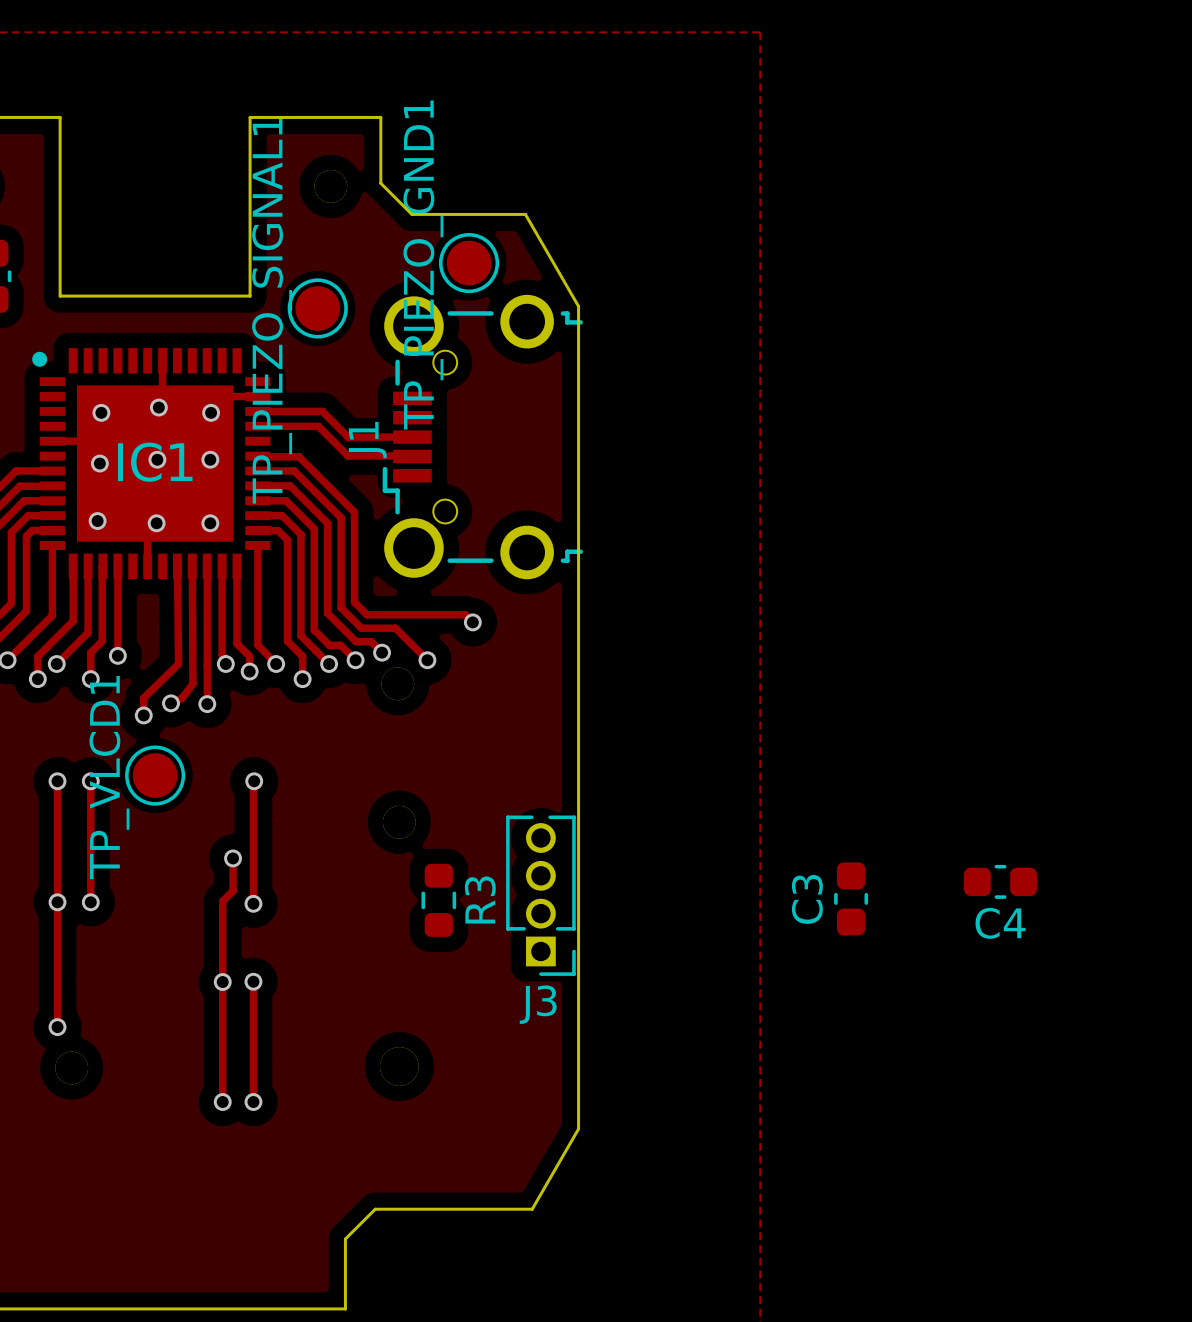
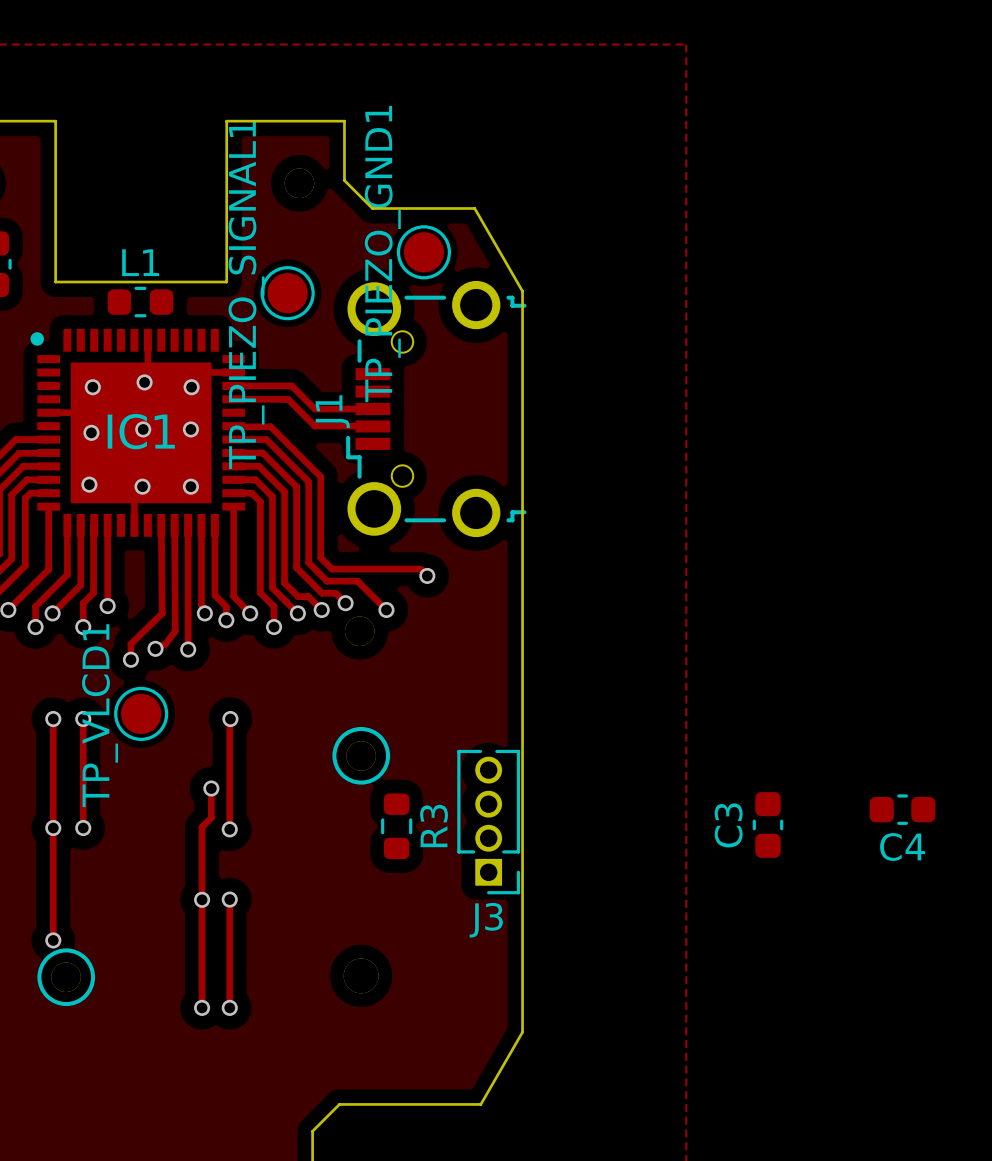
L1: none -> (140, 302)
drawing: none -> [332, 726, 391, 785]
drawing: none -> [37, 948, 96, 1007]

